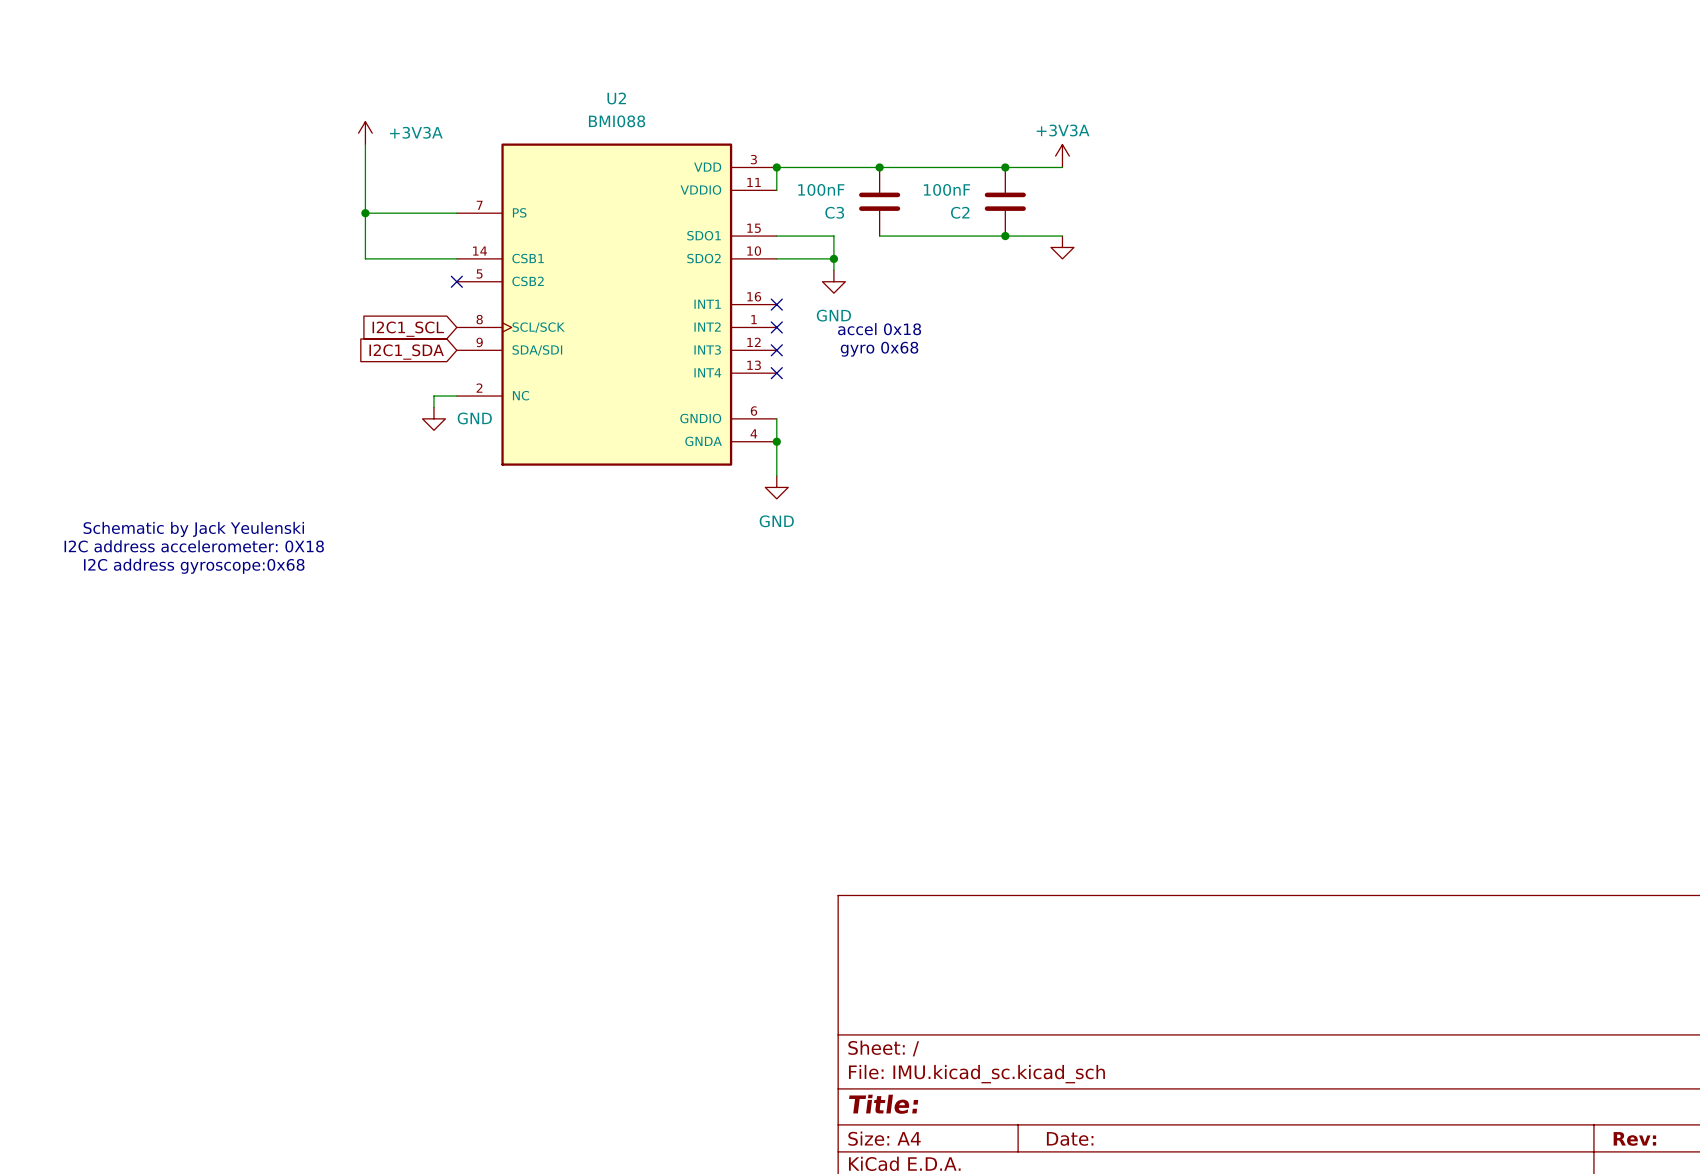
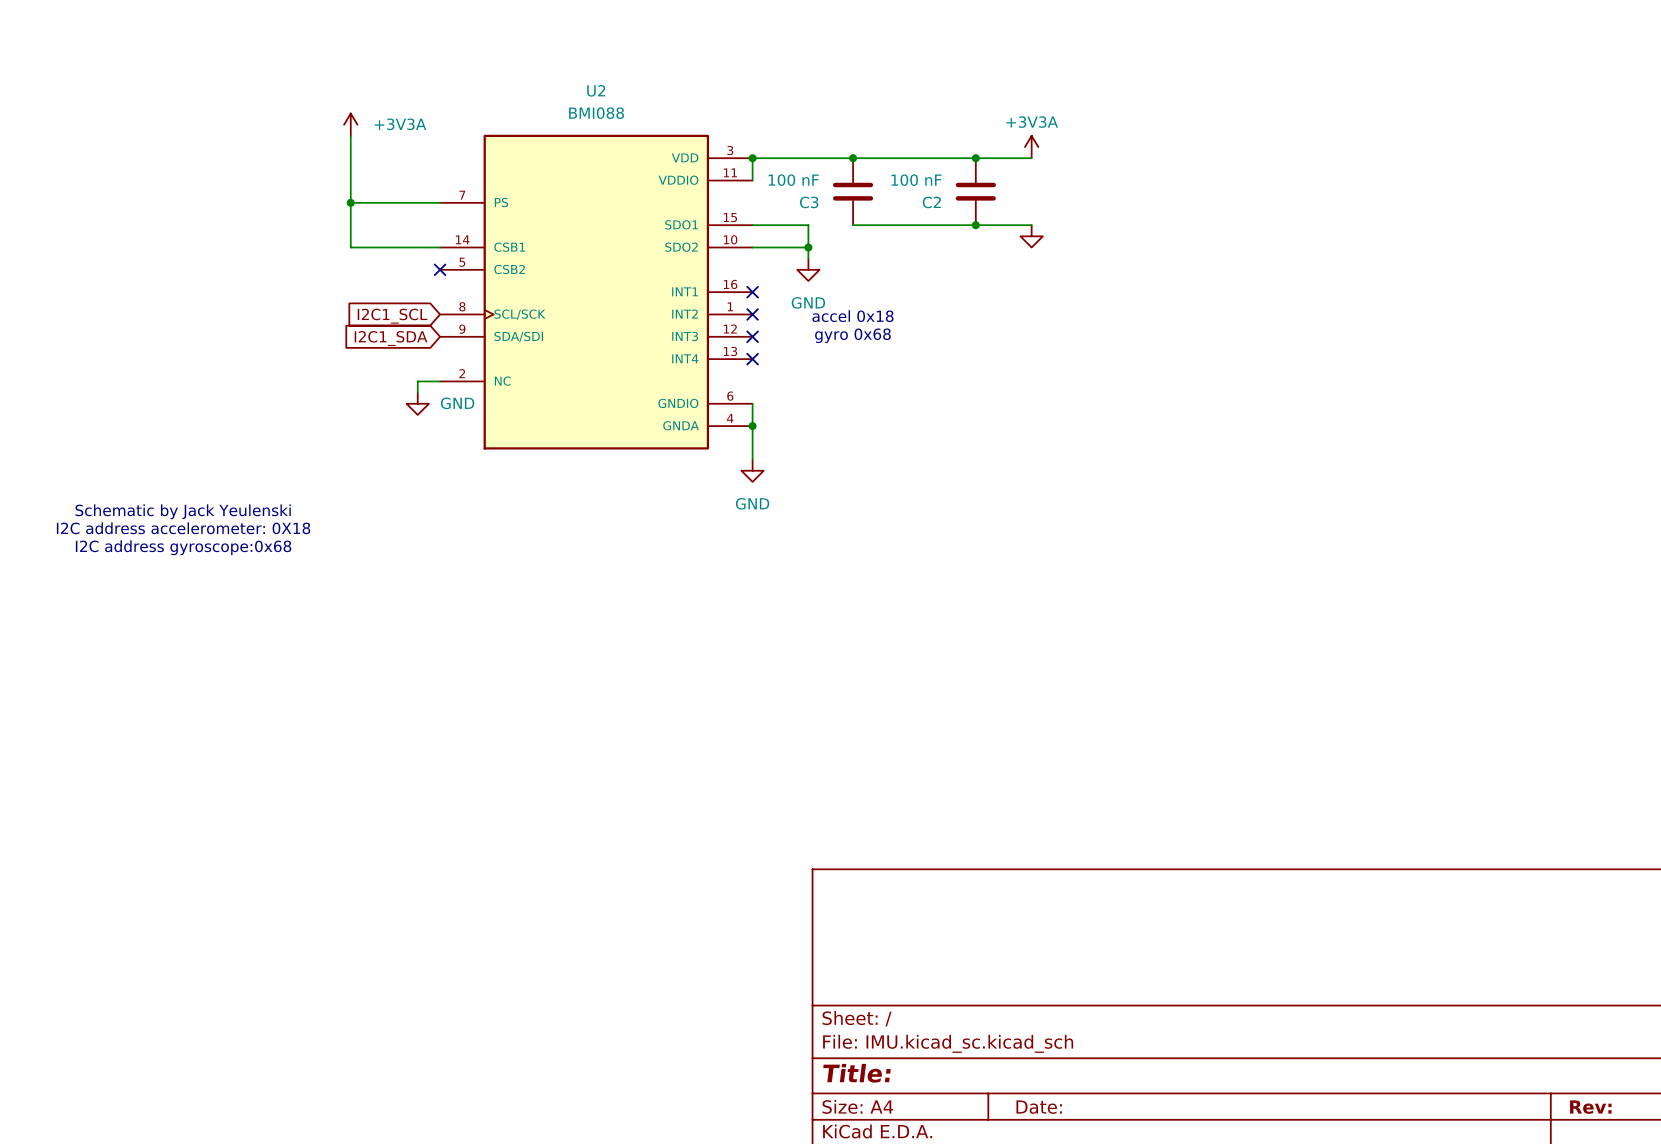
C3 value: 100nF (821, 189) -> 100 nF (793, 180)
C2 value: 100nF (947, 189) -> 100 nF (916, 180)

